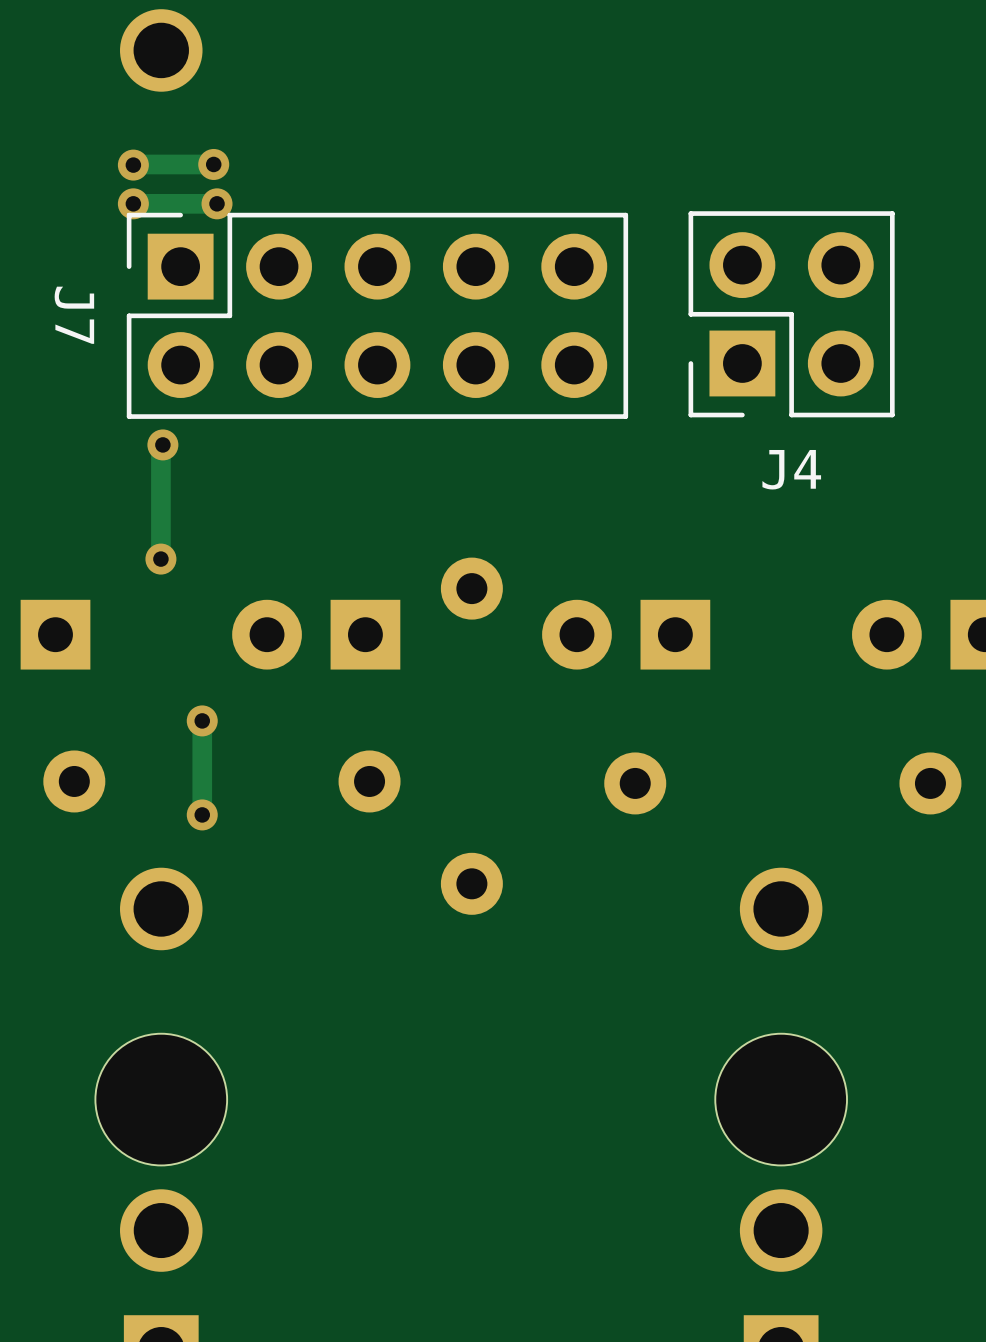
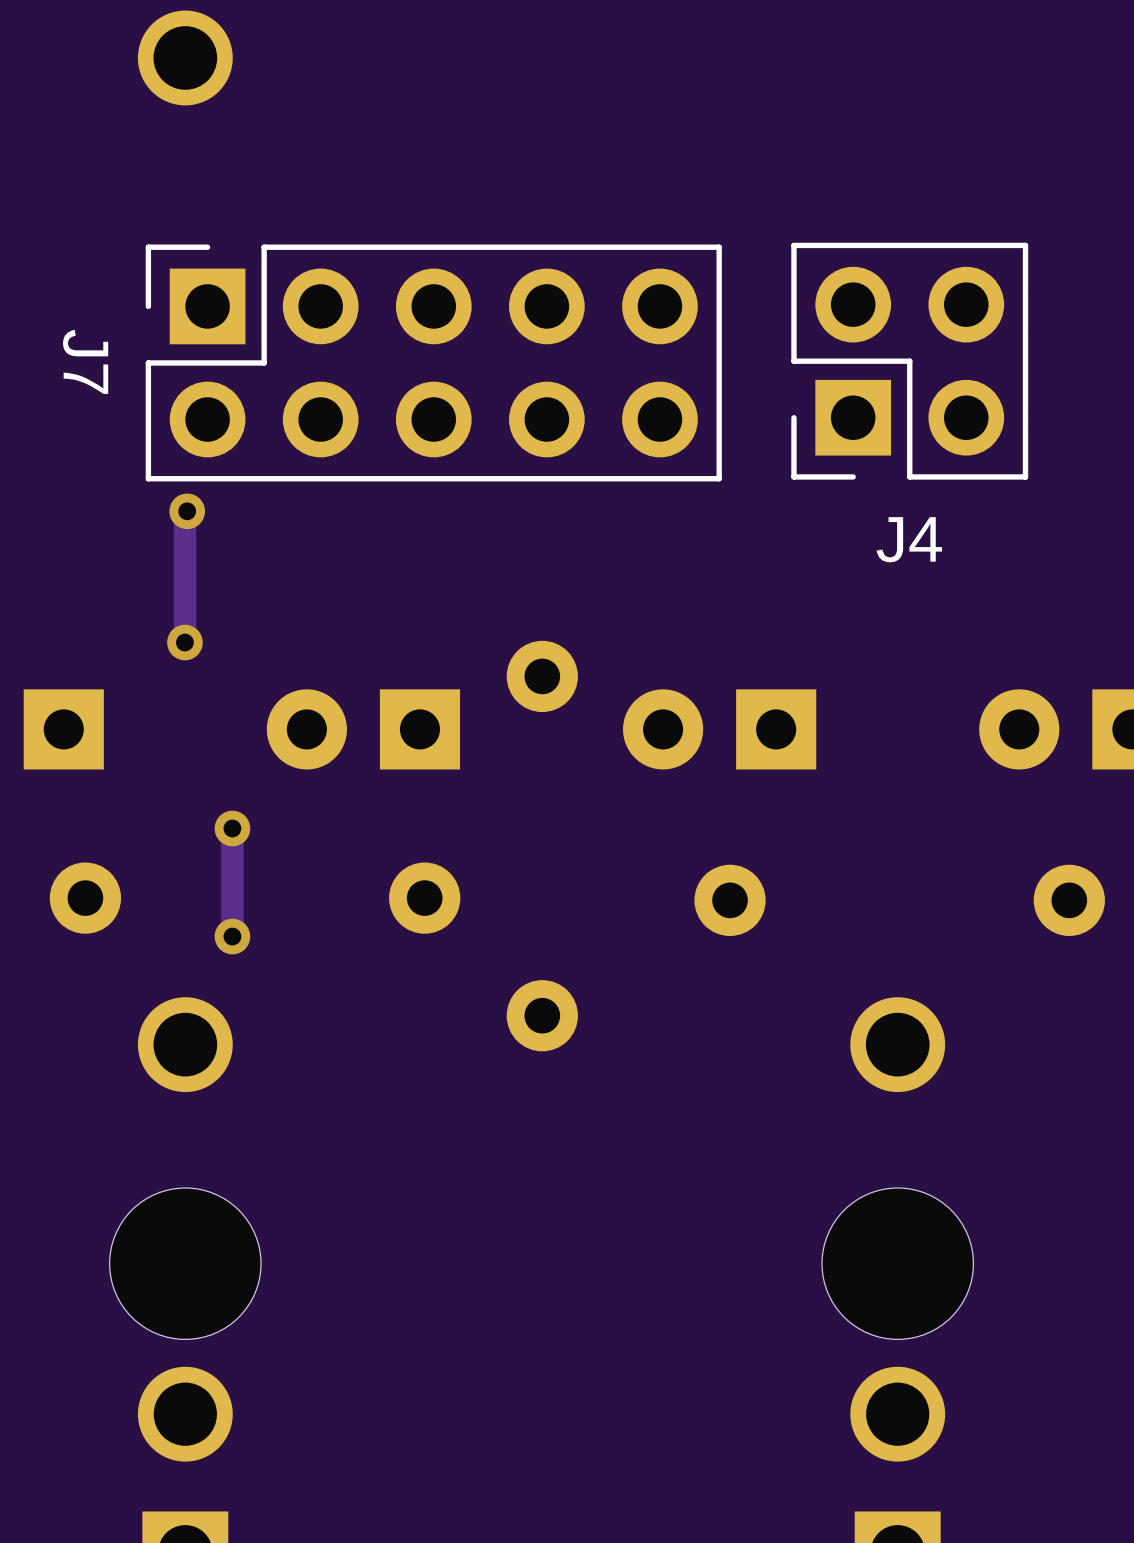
track: (213, 164) (133, 165) -> none
via: (213, 164) -> none
via: (133, 165) -> none
via: (133, 203) -> none
track: (217, 203) (133, 203) -> none
via: (217, 203) -> none

